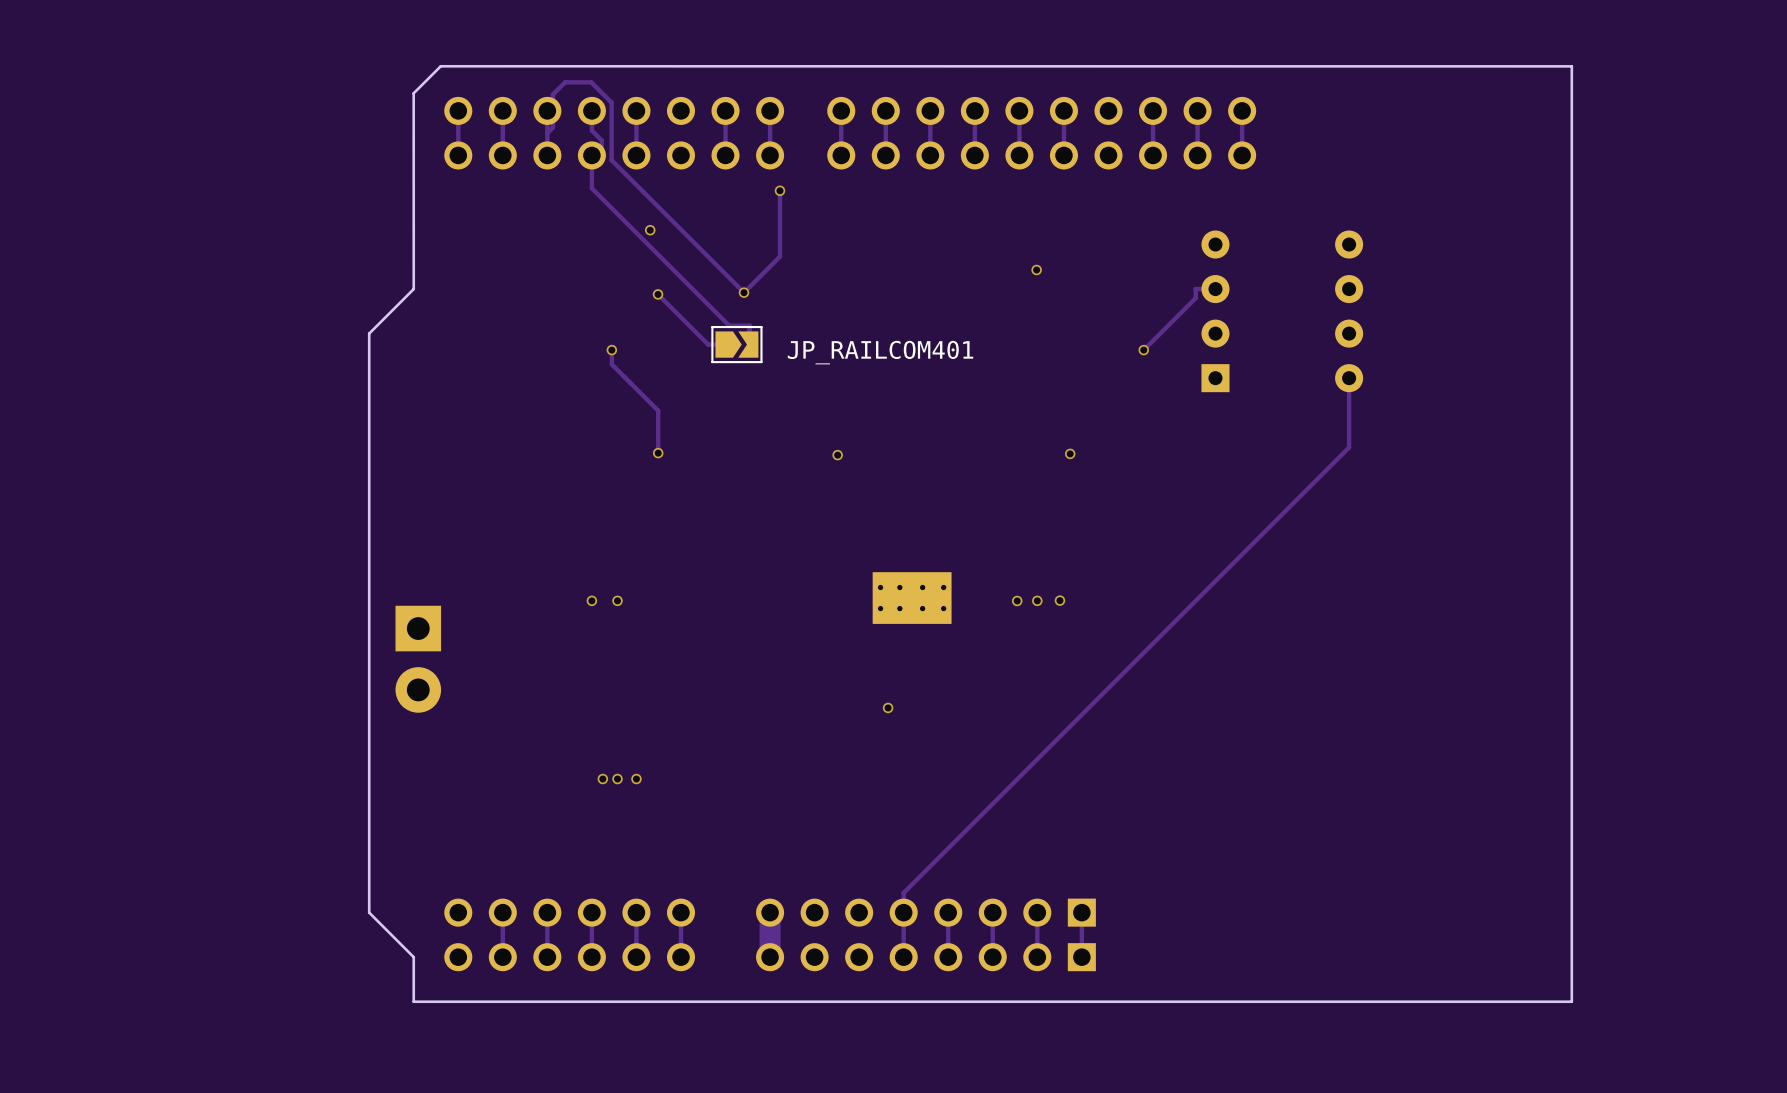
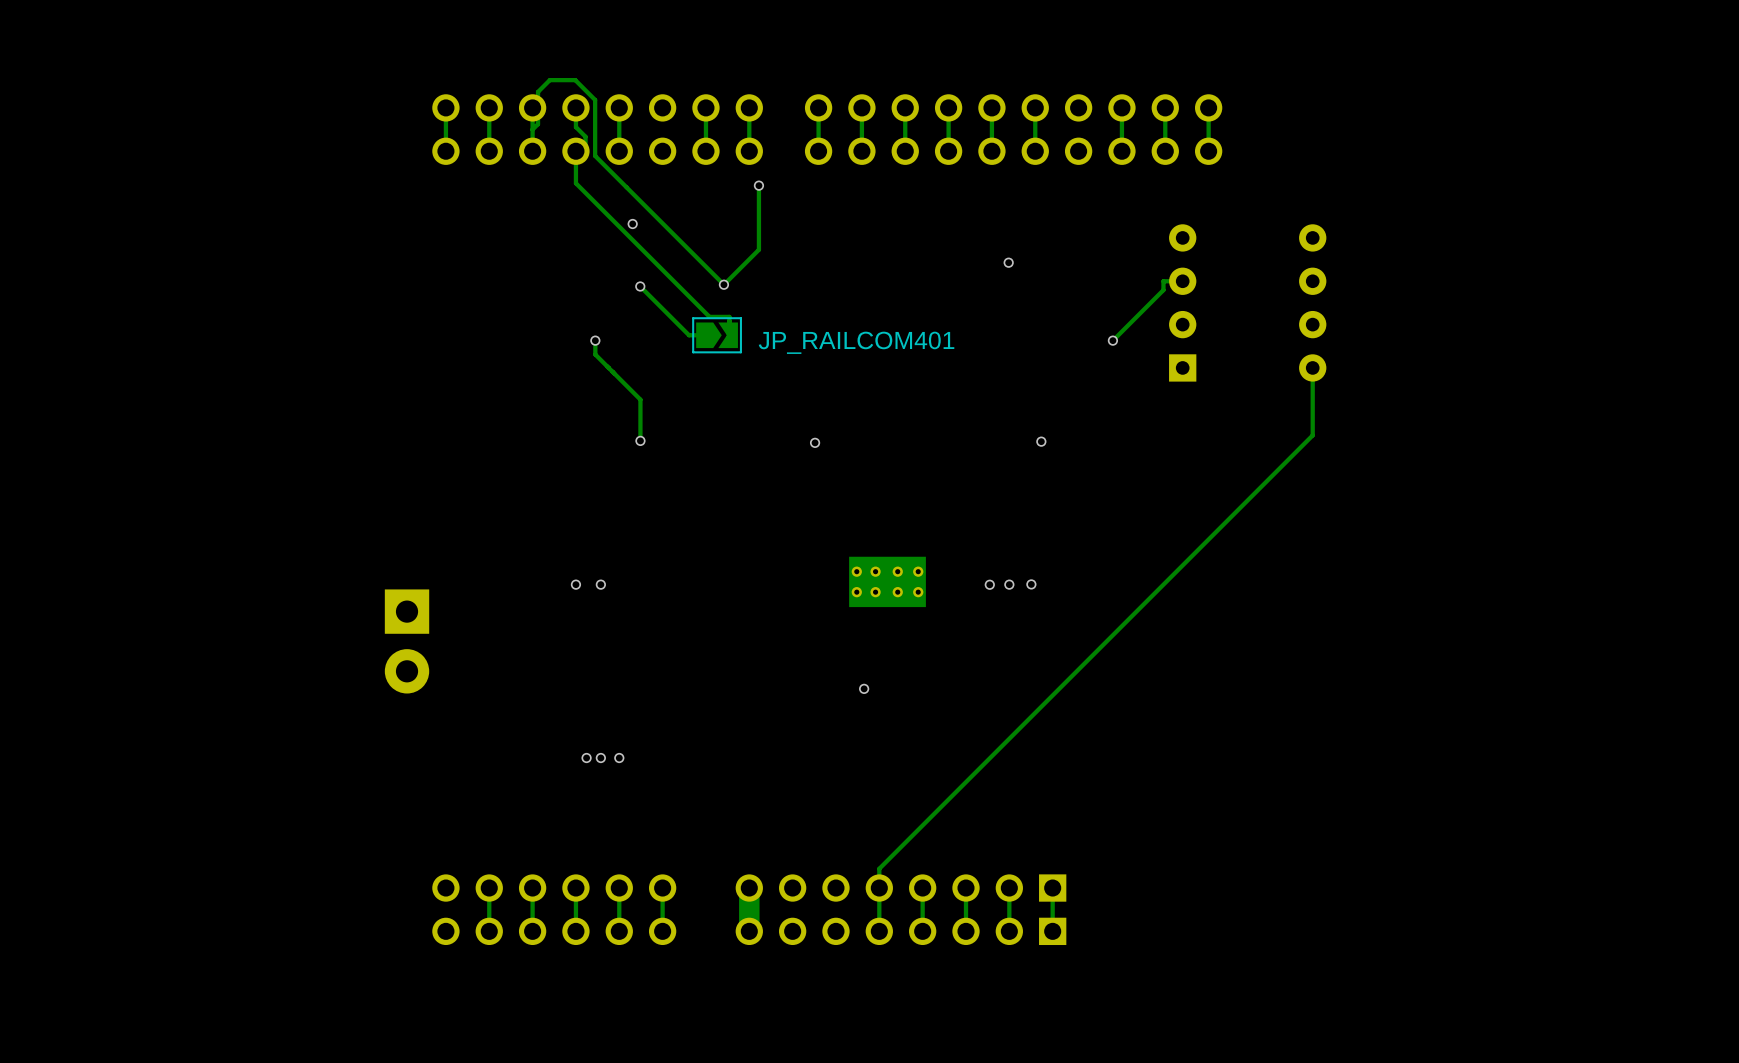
board edge: (1571, 66) (440, 66) (413, 93) (413, 289) (369, 333) (369, 912) (413, 957) (413, 1001) (1571, 1001) (1571, 66) -> none

